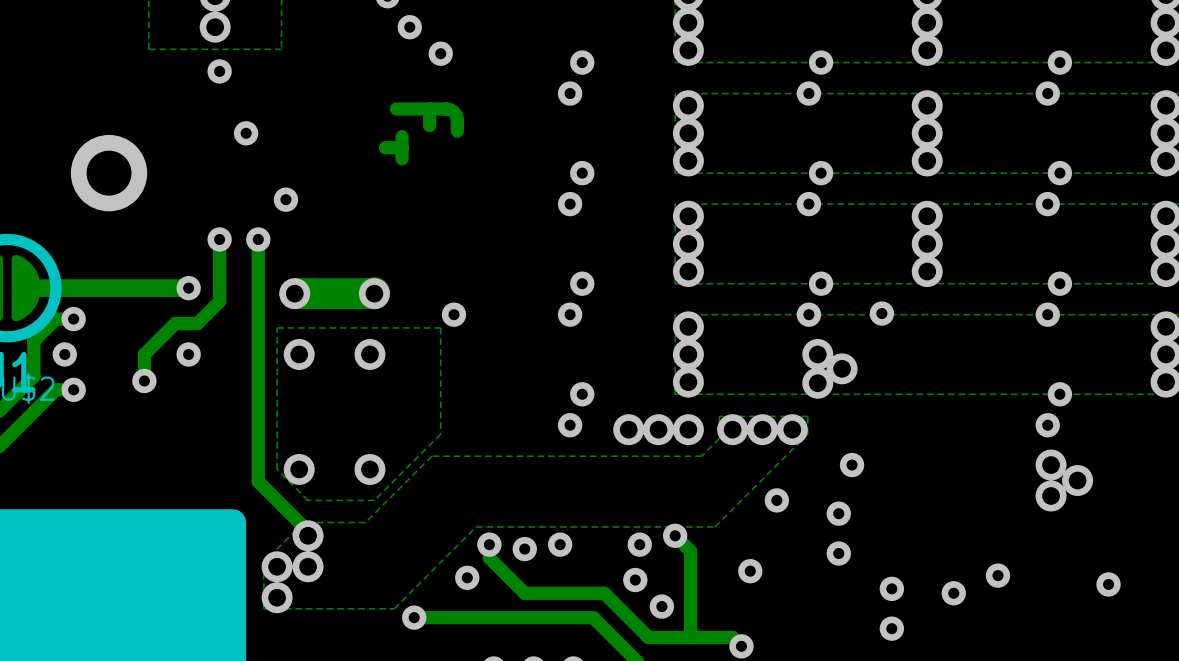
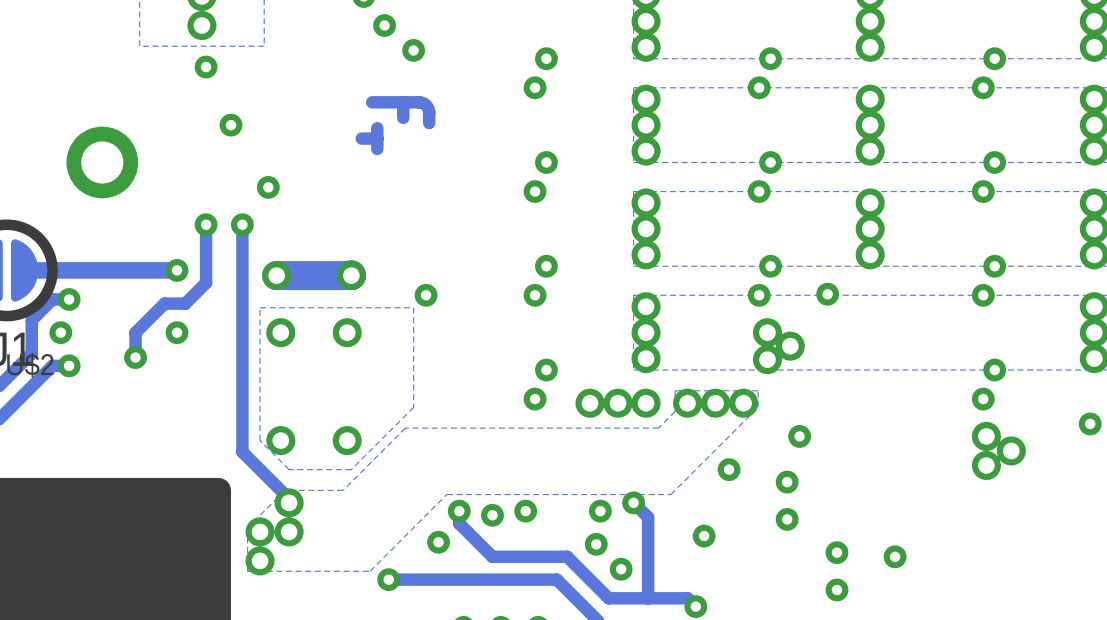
via: none -> (1090, 423)
via: (997, 575) -> none
via: (1108, 584) -> none

